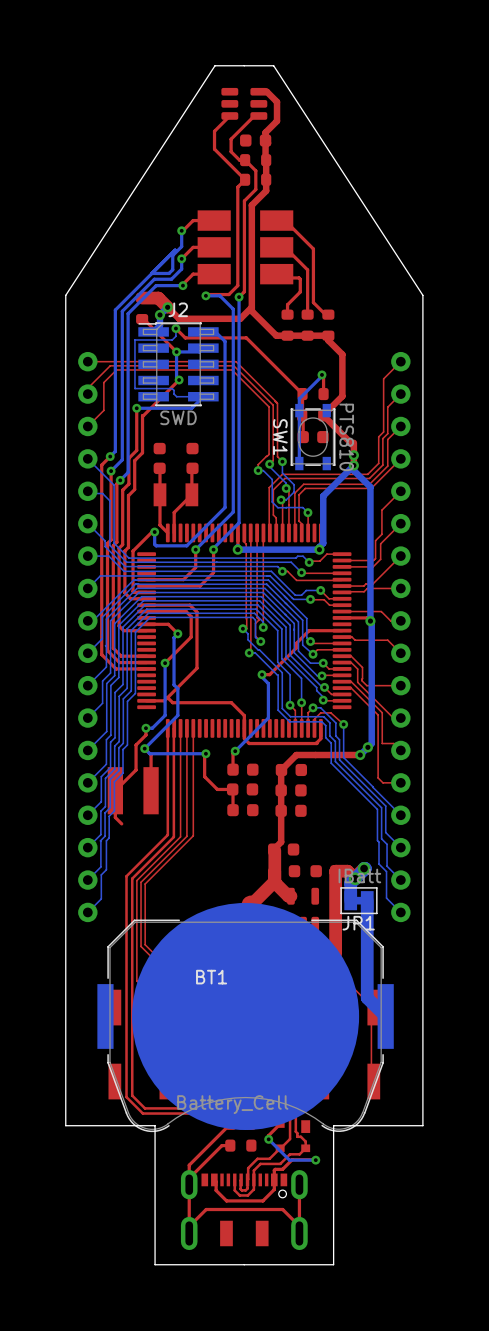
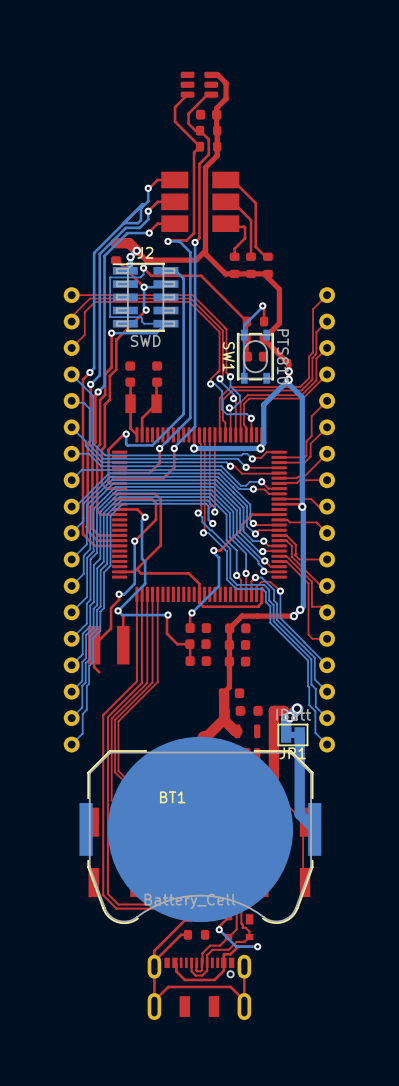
board edge: (273, 65) (215, 65) (65, 295) (65, 1125) (155, 1125) (155, 1264) (333, 1264) (333, 1125) (422, 1125) (422, 295) (273, 65) -> none

